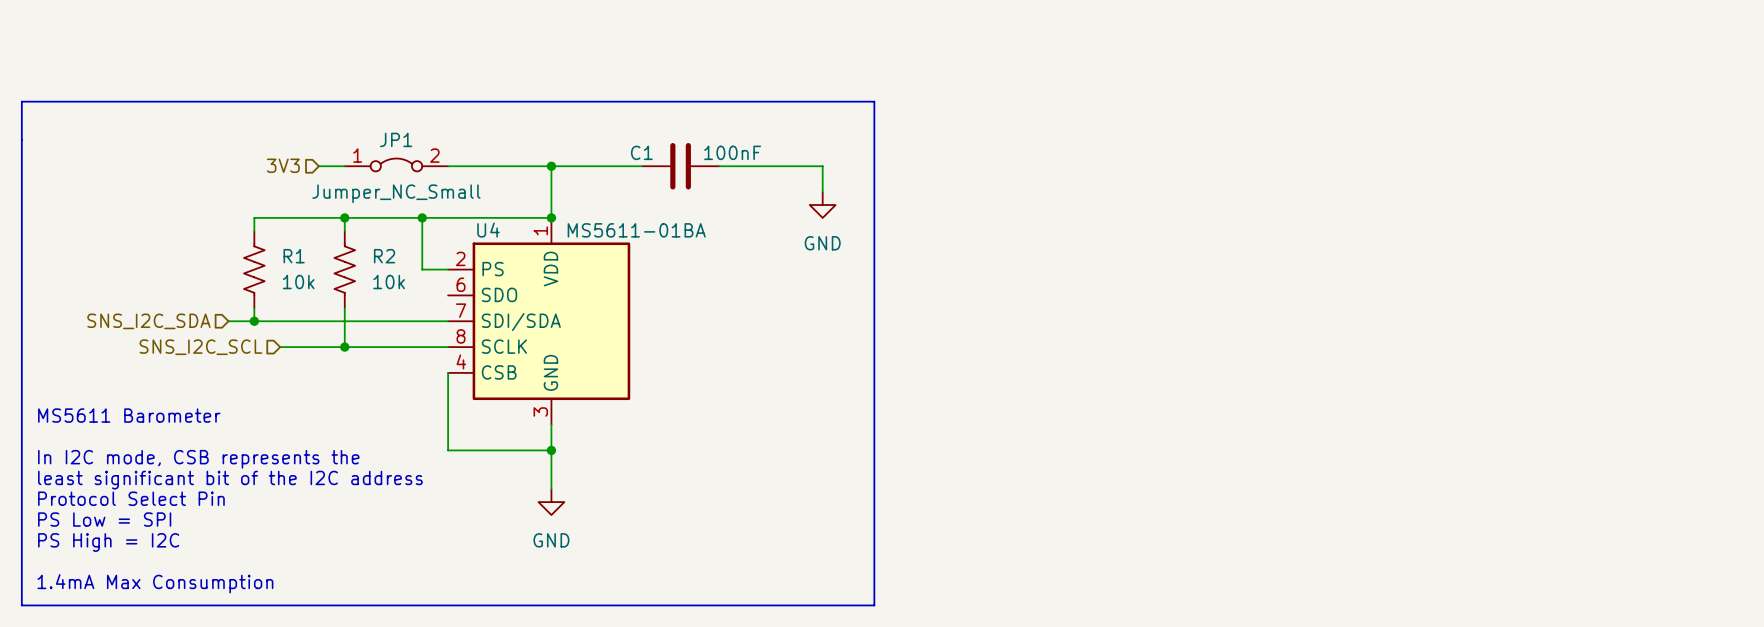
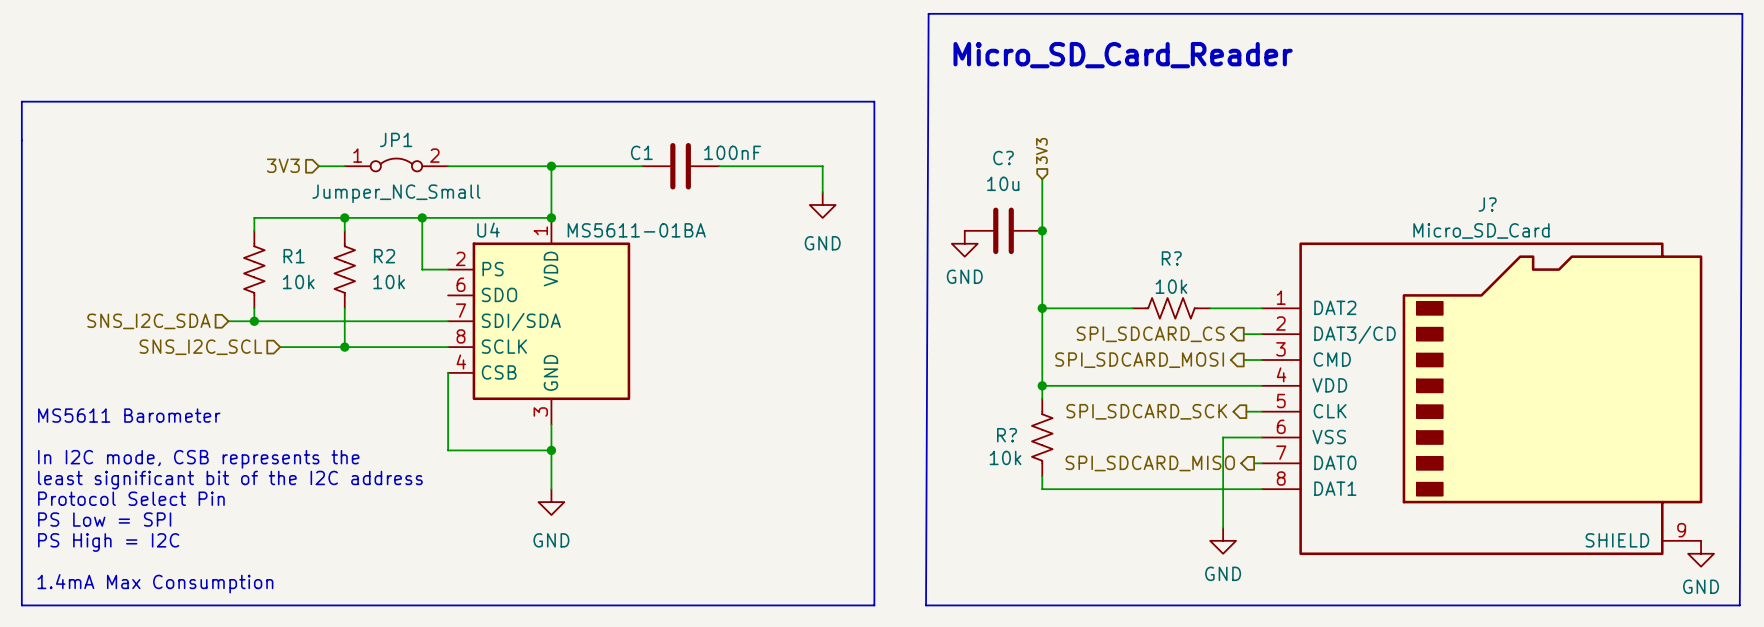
line: none -> (928, 13) (1742, 13) (1739, 605) (926, 605) (928, 13)
text: none -> Micro_SD_Card_Reader (1123, 55)
hierarchical label: none -> 3V3 (1041, 151)
wire: none -> (1042, 179) (1042, 398)
C?: none -> 10u (1003, 230)
junction: none -> (1042, 230)
power symbol: none -> GND (964, 243)
wire: none -> (1042, 308) (1132, 308)
junction: none -> (1042, 308)
R?: none -> 10k (1171, 308)
wire: none -> (1210, 308) (1261, 308)
hierarchical label: none -> SPI_SDCARD_CS (1150, 334)
wire: none -> (1243, 334) (1261, 334)
hierarchical label: none -> SPI_SDCARD_MOSI (1139, 360)
wire: none -> (1243, 360) (1261, 360)
wire: none -> (1042, 385) (1261, 385)
junction: none -> (1042, 385)
J?: none -> Micro_SD_Card (1482, 398)
hierarchical label: none -> SPI_SDCARD_SCK (1146, 411)
wire: none -> (1246, 411) (1261, 411)
R?: none -> 10k (1042, 437)
wire: none -> (1261, 437) (1223, 437) (1223, 527)
hierarchical label: none -> SPI_SDCARD_MISO (1150, 463)
wire: none -> (1254, 463) (1261, 463)
wire: none -> (1042, 476) (1042, 489) (1261, 489)
power symbol: none -> GND (1223, 540)
power symbol: none -> GND (1701, 553)

